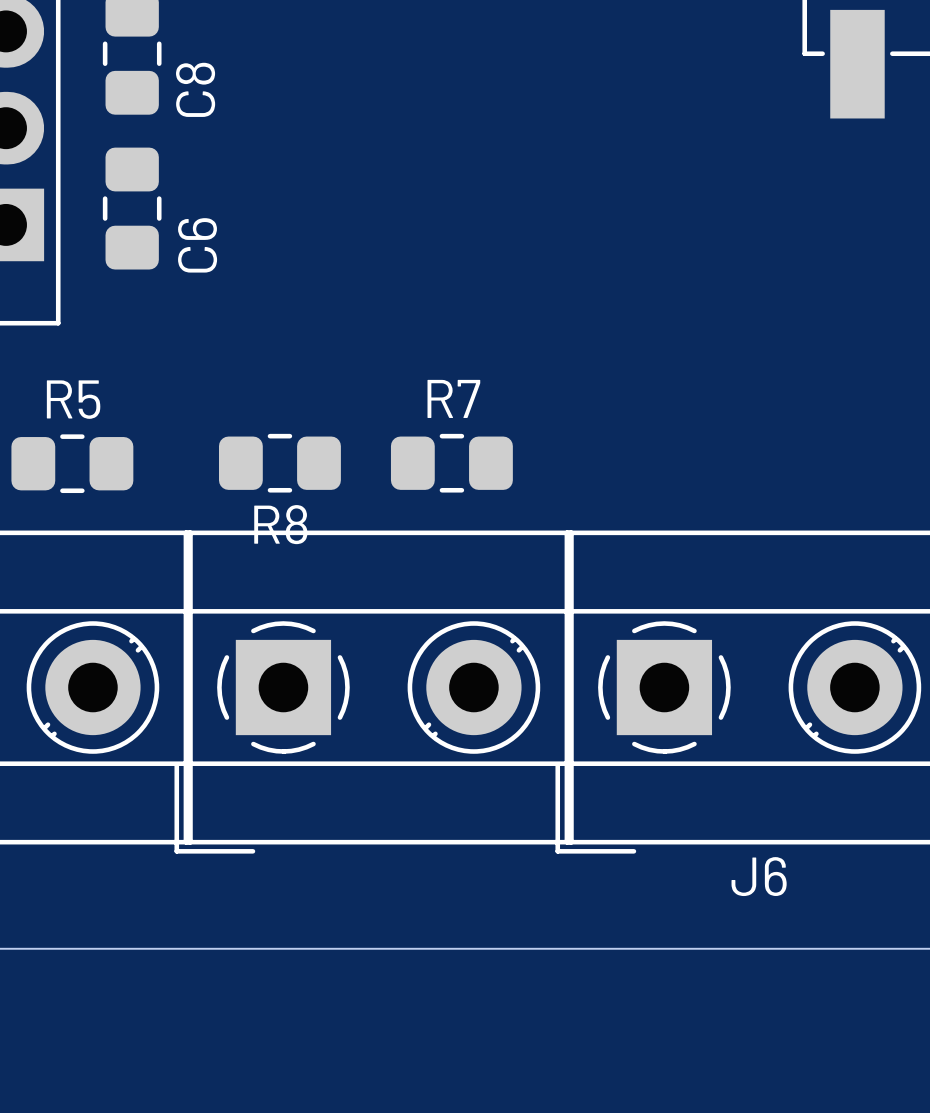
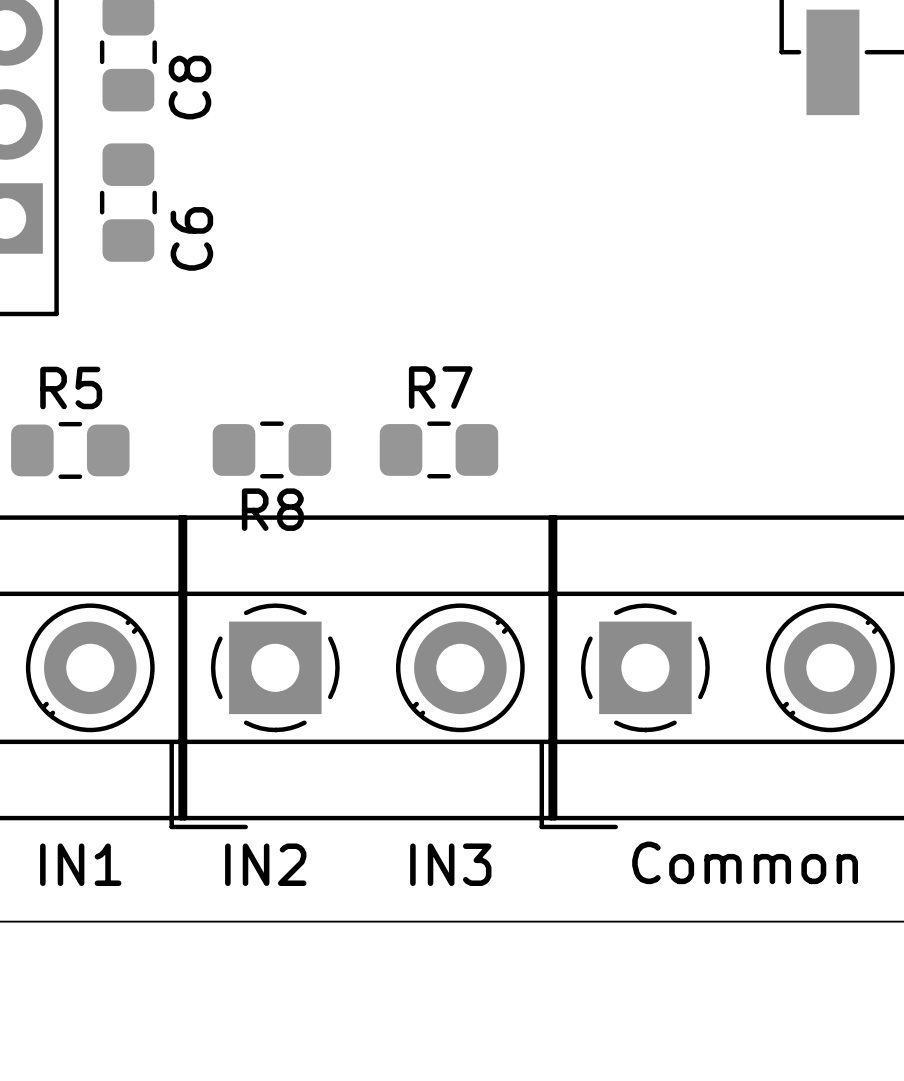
J6 name: J6 (759, 876) -> Common (745, 862)
text: none -> IN2 (265, 864)
text: none -> IN1 (80, 864)
text: none -> IN3 (450, 864)

